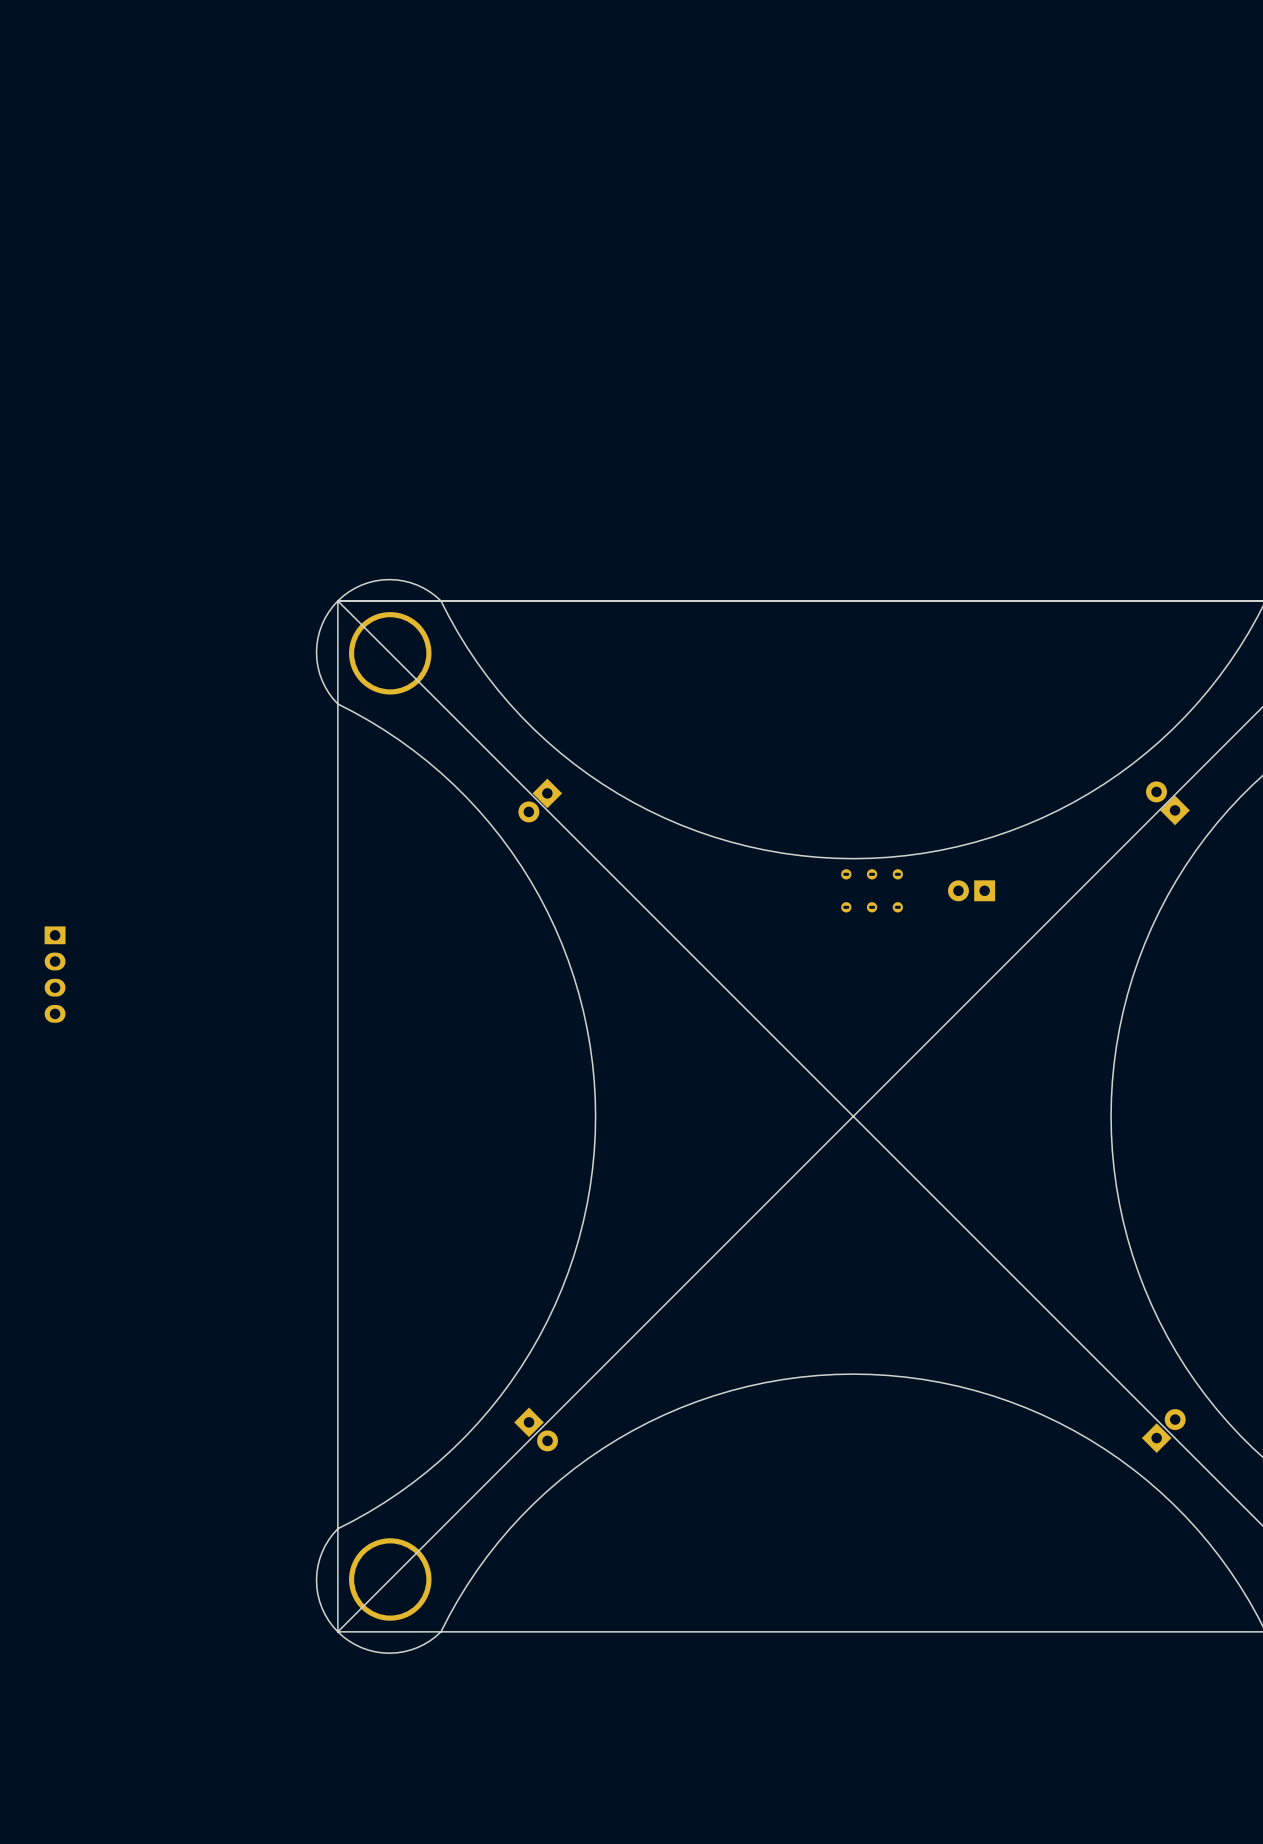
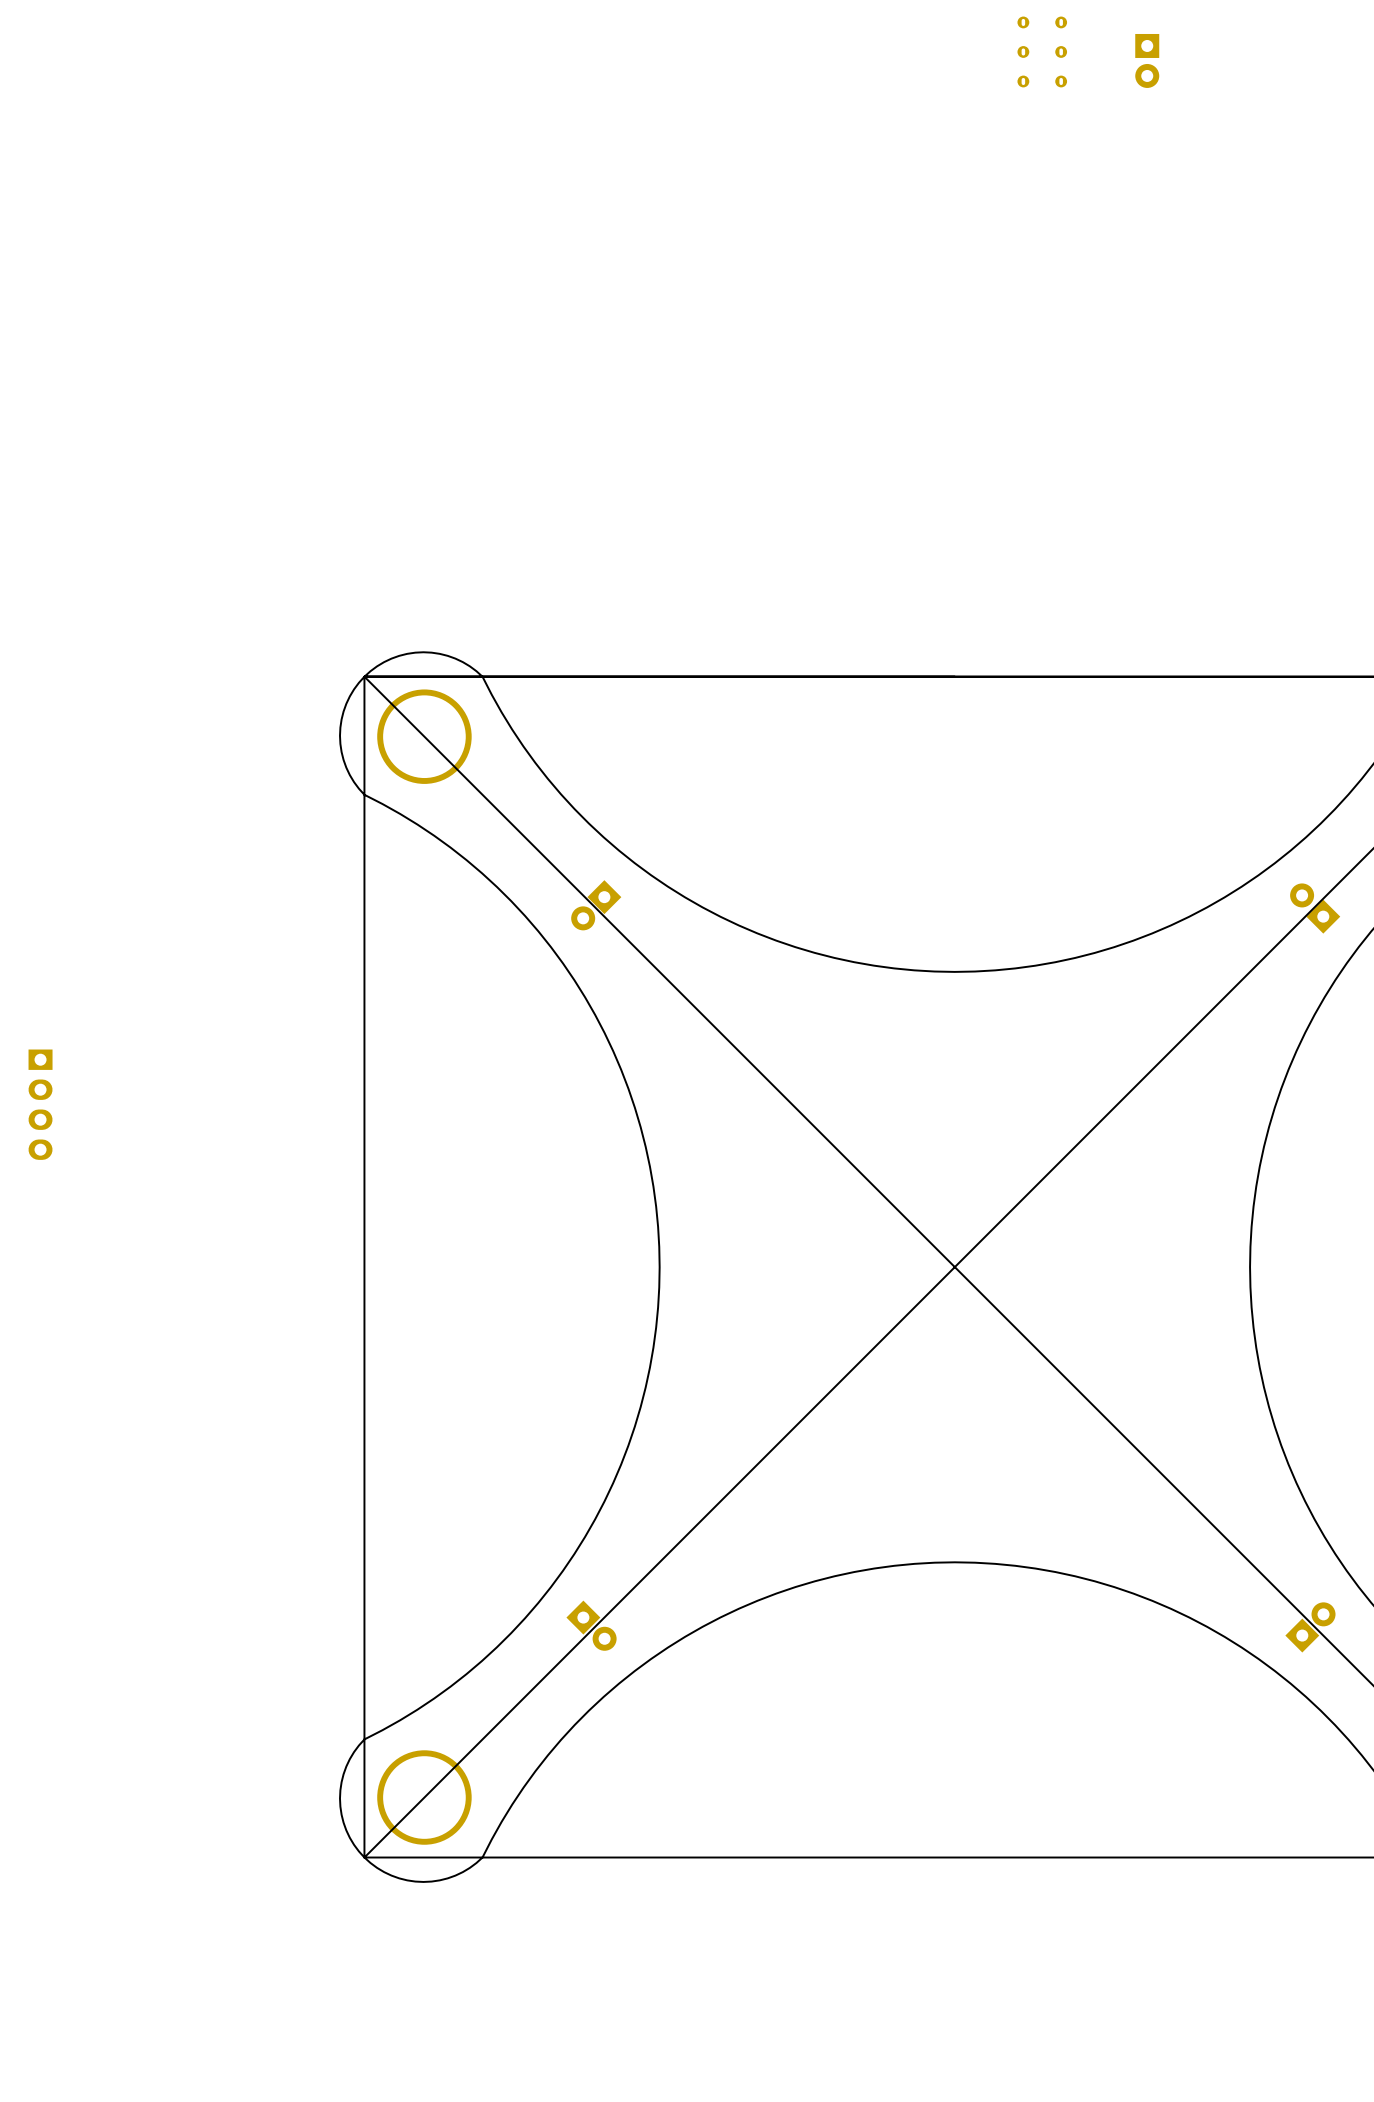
part: none -> (1042, 51)
part: none -> (1147, 60)
part: (872, 890) -> none
part: (971, 890) -> none

